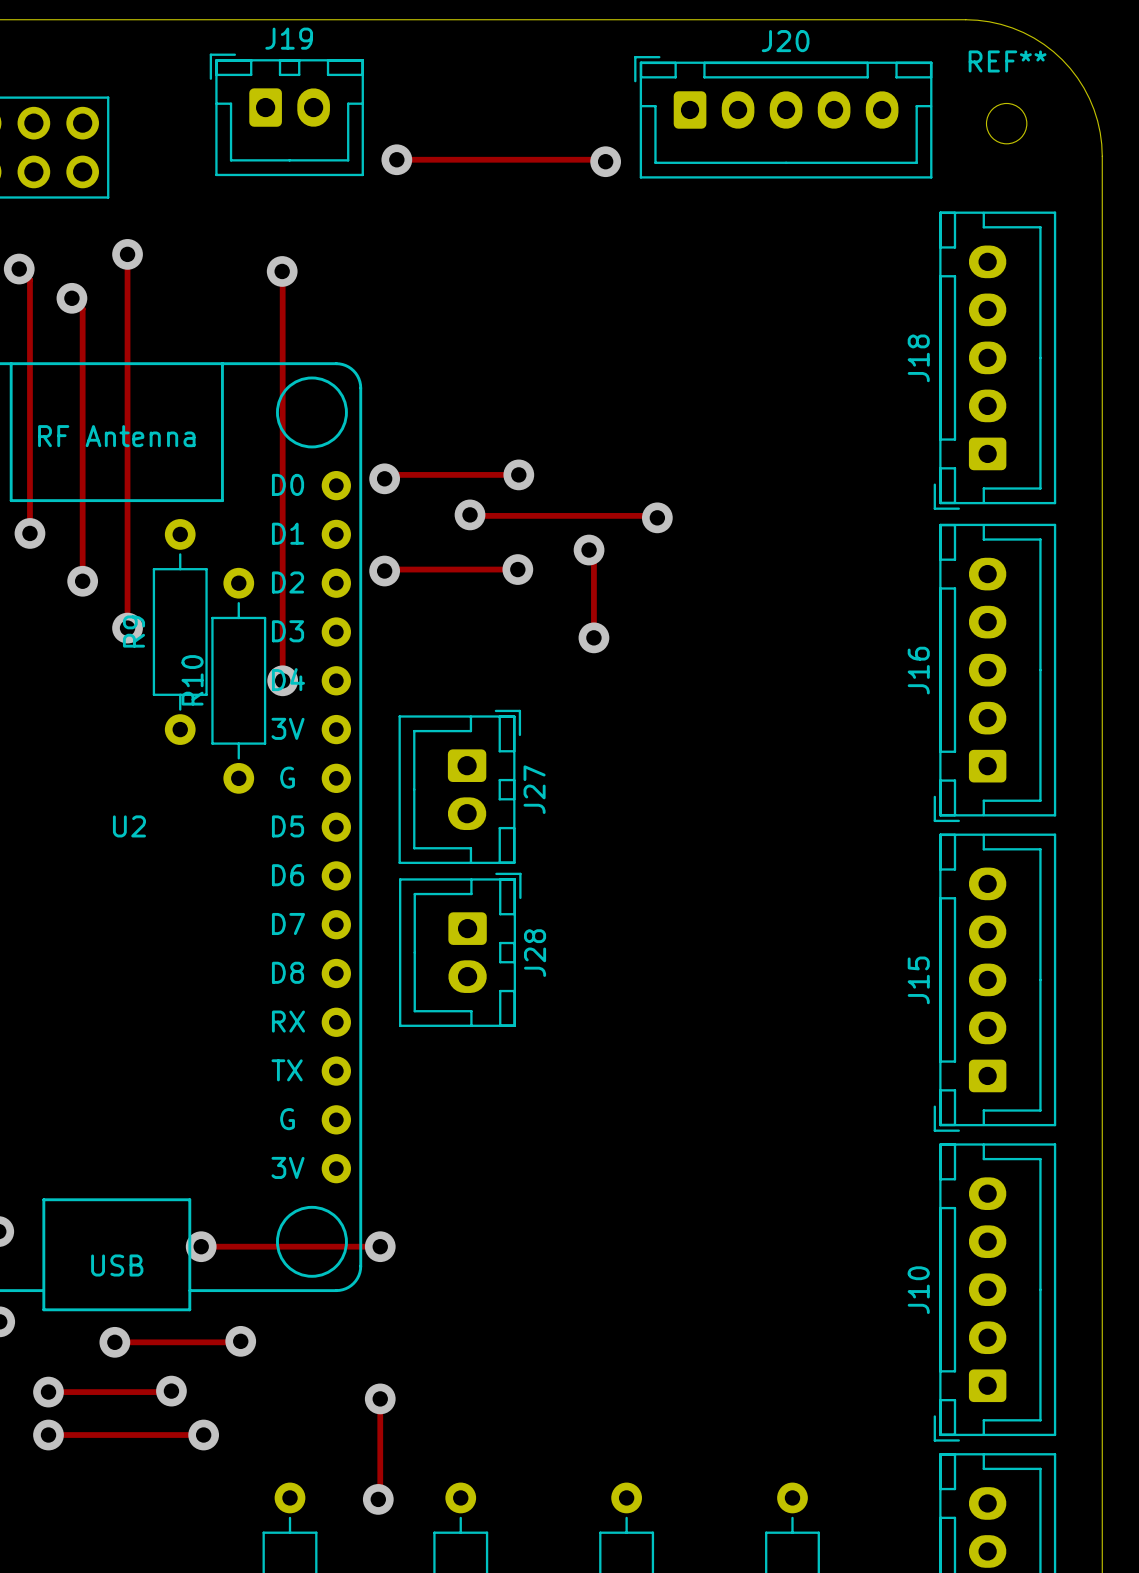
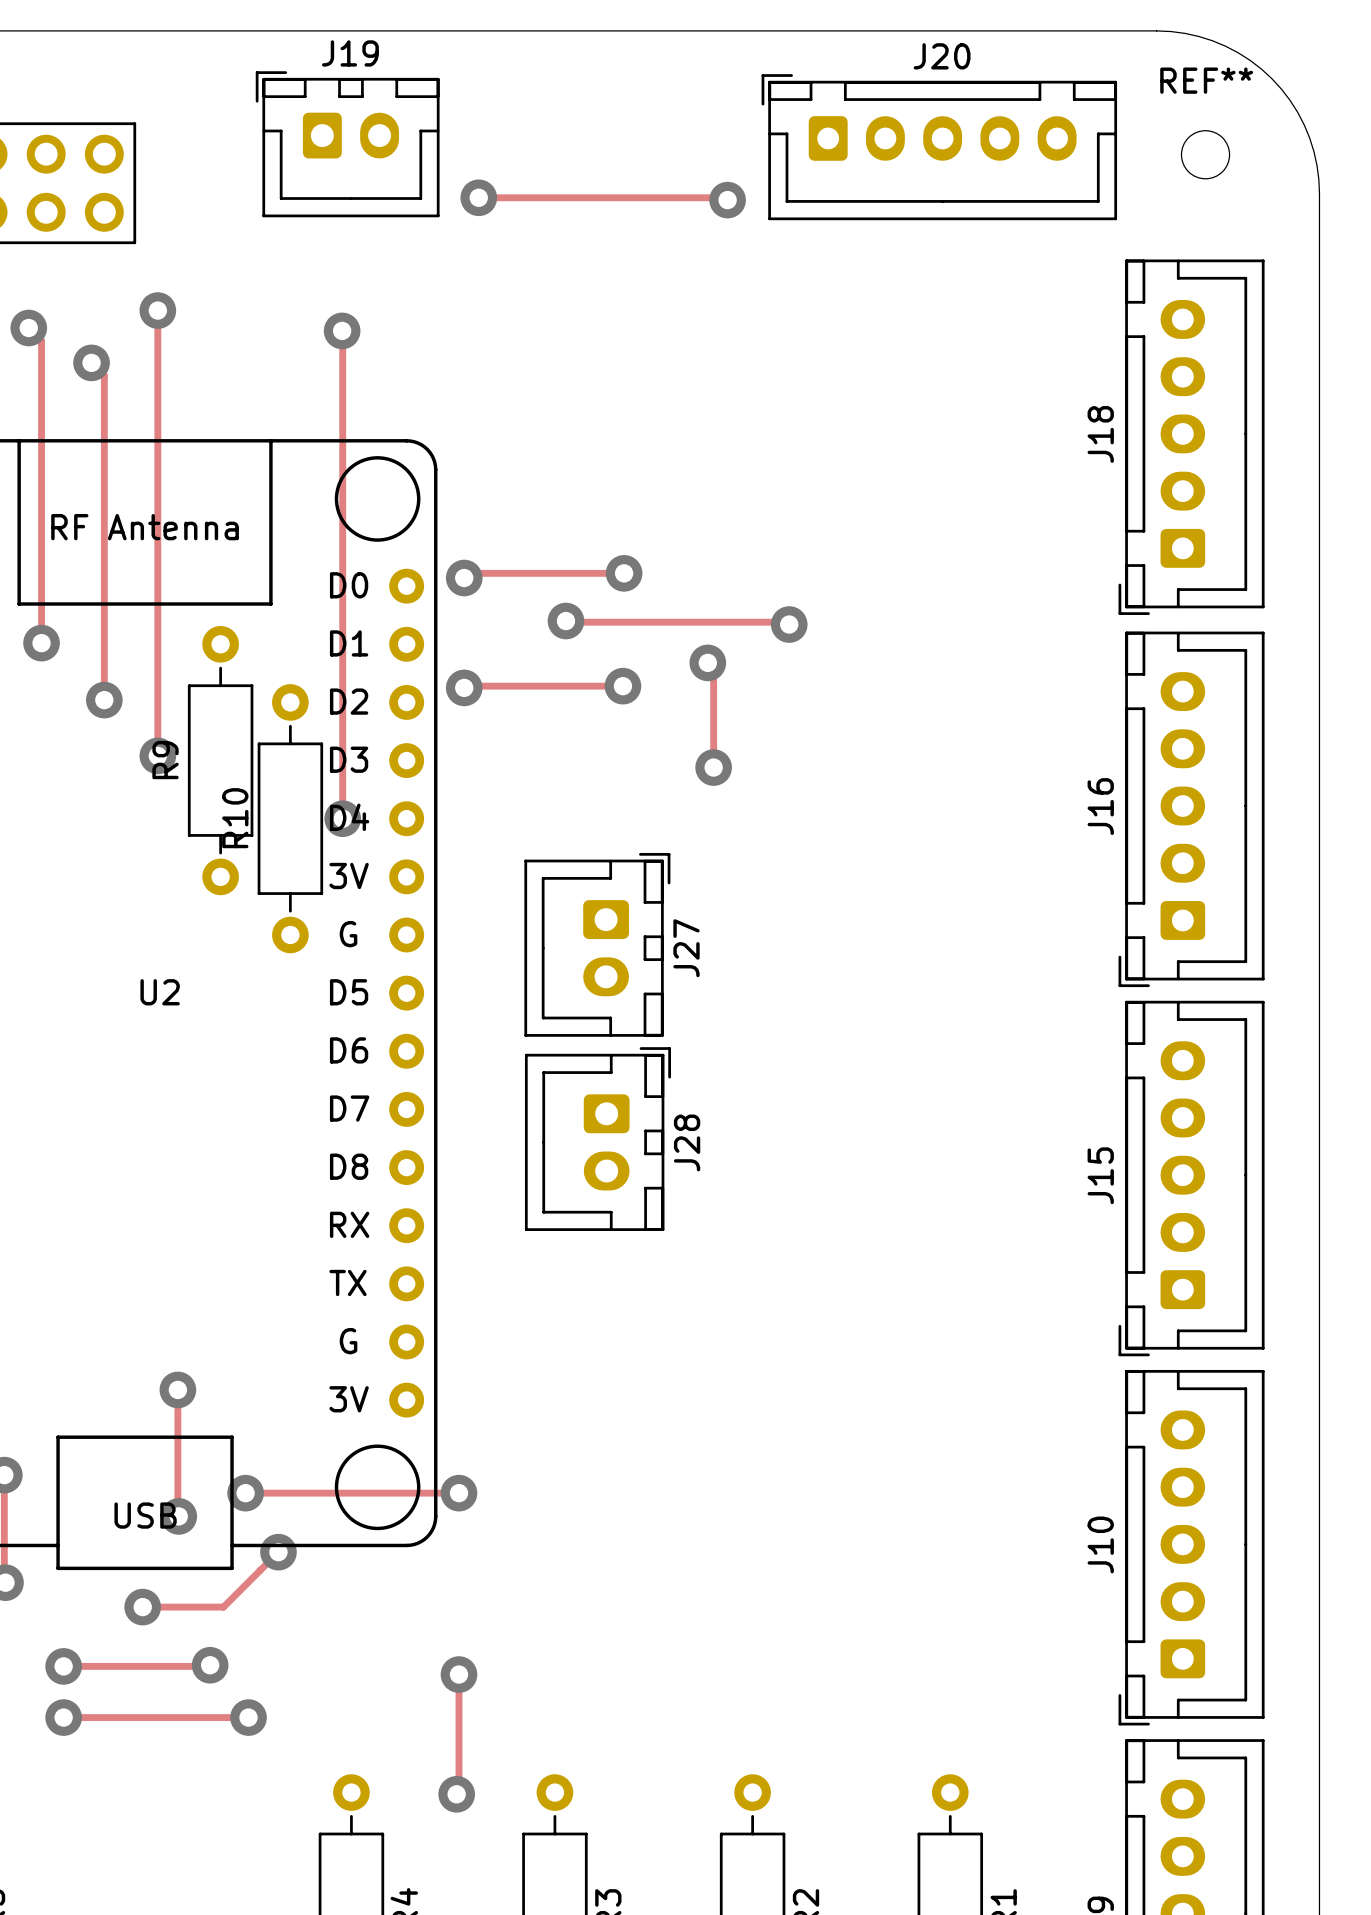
J27 position: (459, 786) -> (597, 944)
J28 position: (460, 949) -> (597, 1139)
track: none -> (177, 1389) (178, 1516)
via: none -> (177, 1389)
via: none -> (178, 1516)
track: (240, 1341) (182, 1342) -> (278, 1552) (223, 1607)
via position: (240, 1341) -> (278, 1552)

